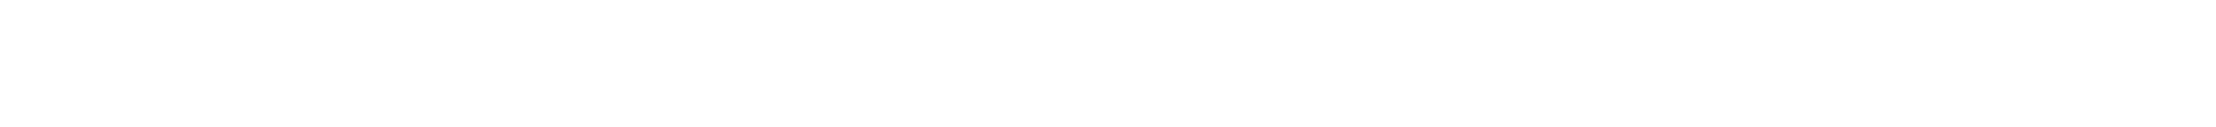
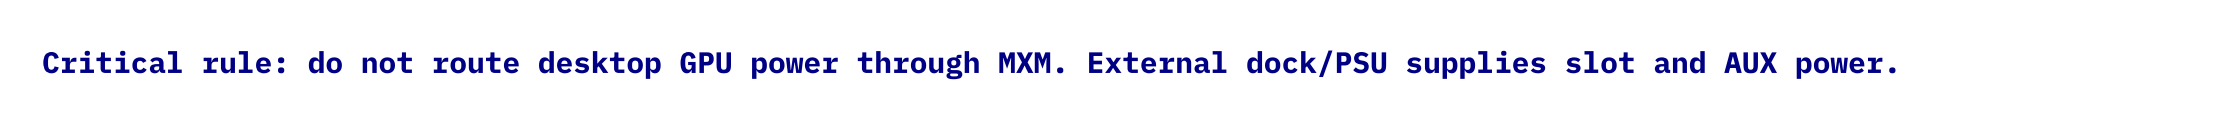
text: none -> Critical rule: do not route desktop GPU power through MXM. External dock/PSU supplies slot and AUX power. (969, 64)

